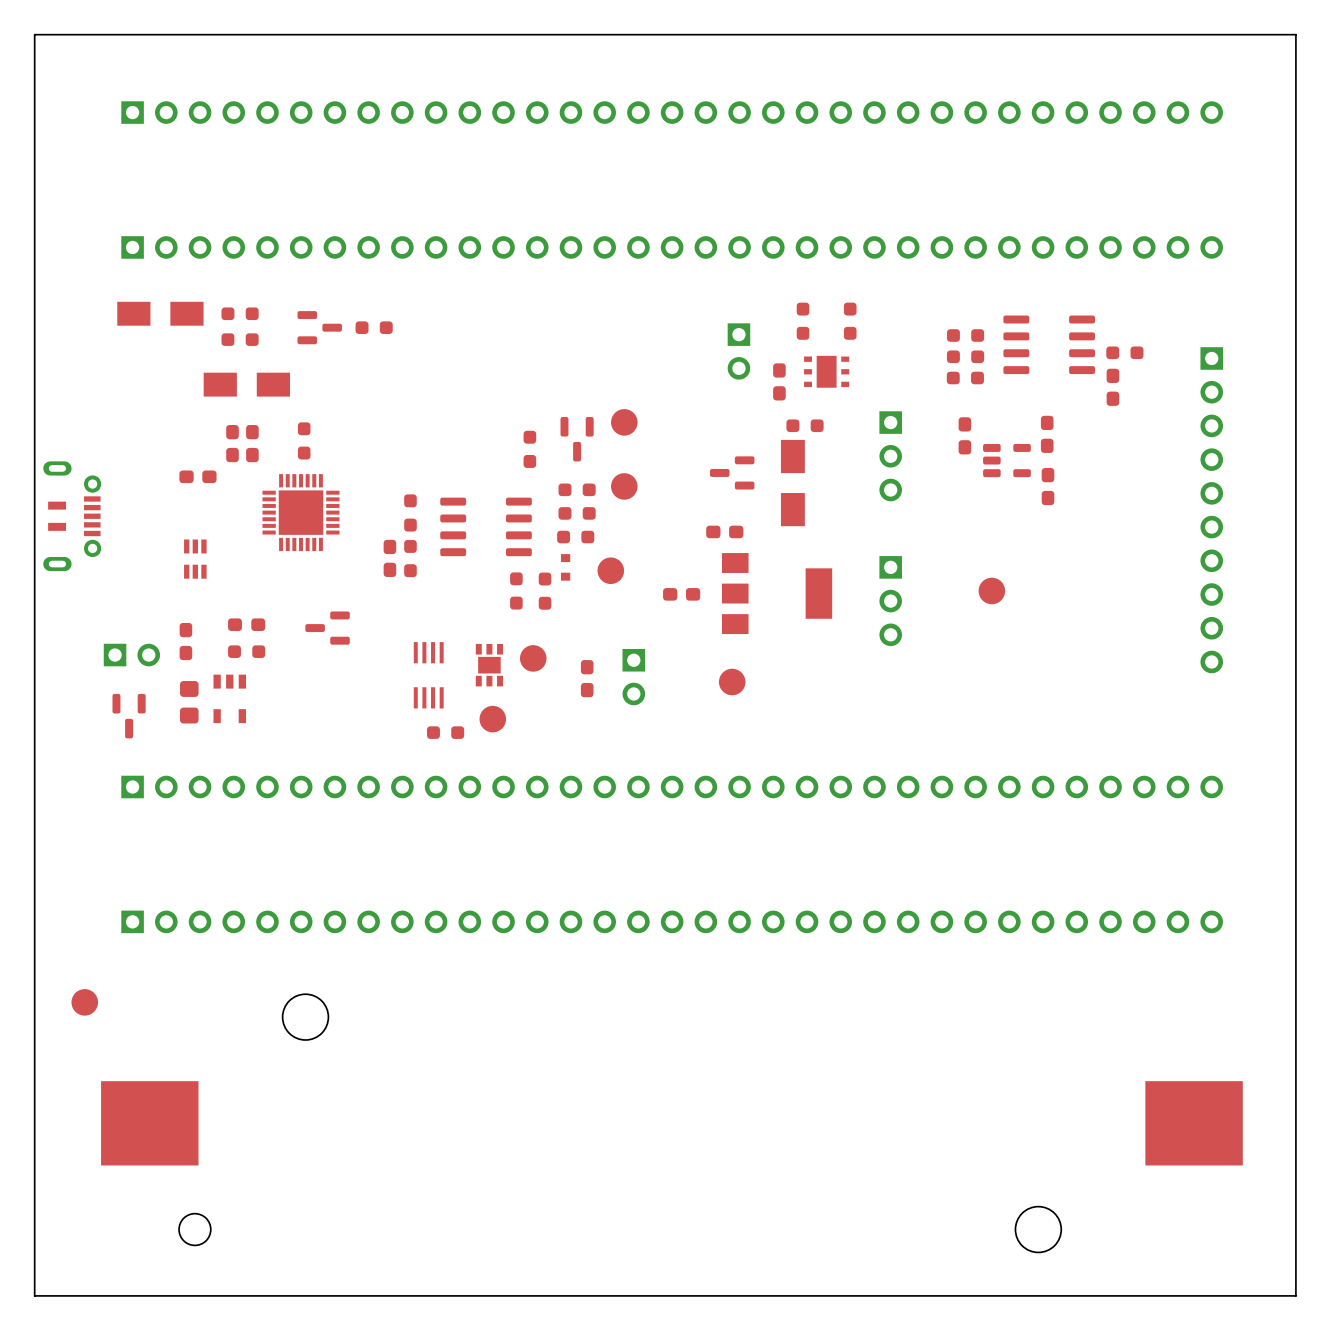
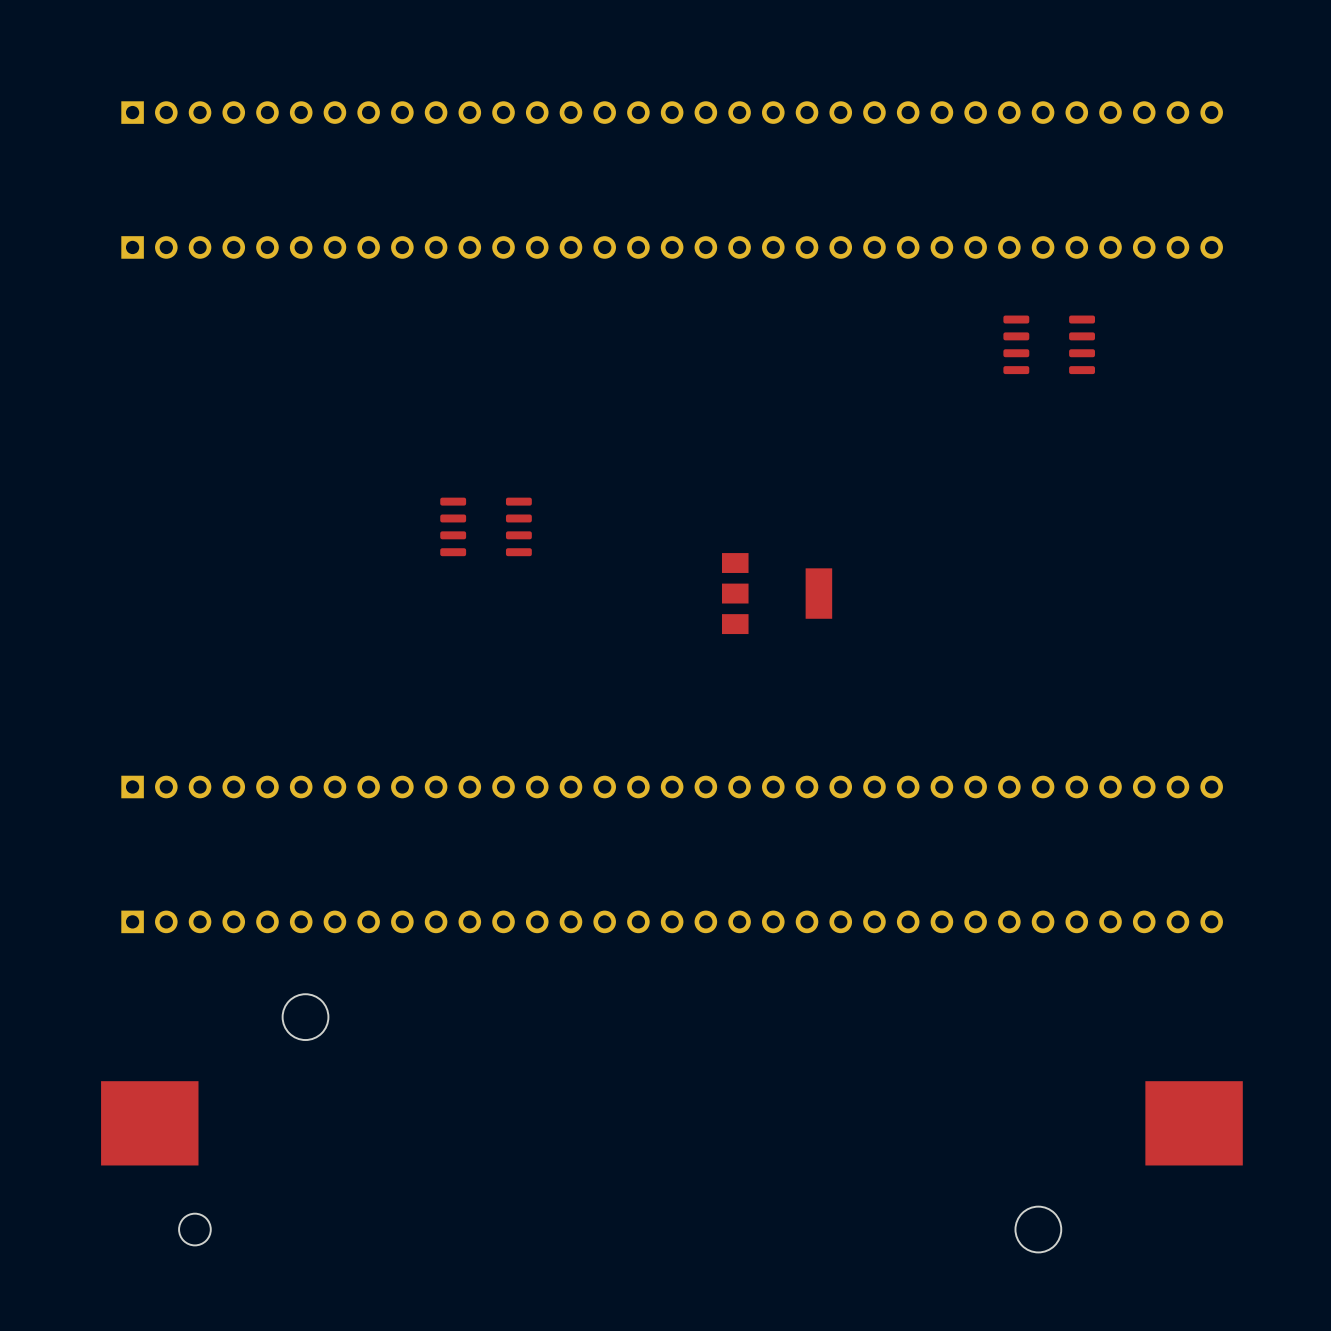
board edge: (1295, 34) (34, 34) (34, 1295) (1295, 1295) (1295, 34) -> none
part: (160, 313) -> none
part: (240, 313) -> none
part: (803, 321) -> none
part: (850, 321) -> none
part: (319, 327) -> none
part: (374, 327) -> none
part: (965, 335) -> none
part: (240, 339) -> none
part: (738, 351) -> none
part: (1124, 352) -> none
part: (965, 356) -> none
part: (826, 371) -> none
part: (965, 378) -> none
part: (779, 381) -> none
part: (246, 384) -> none
part: (1112, 387) -> none
part: (624, 422) -> none
part: (805, 425) -> none
part: (1047, 434) -> none
part: (964, 435) -> none
part: (577, 439) -> none
part: (304, 440) -> none
part: (232, 443) -> none
part: (252, 443) -> none
part: (529, 449) -> none
part: (890, 456) -> none
part: (1006, 460) -> none
part: (732, 472) -> none
part: (197, 476) -> none
part: (792, 483) -> none
part: (624, 486) -> none
part: (1047, 486) -> none
part: (577, 489) -> none
part: (1211, 510) -> none
part: (301, 512) -> none
part: (410, 512) -> none
part: (577, 513) -> none
part: (72, 516) -> none
part: (724, 531) -> none
part: (575, 537) -> none
part: (389, 558) -> none
part: (410, 558) -> none
part: (195, 559) -> none
part: (565, 567) -> none
part: (610, 570) -> none
part: (516, 590) -> none
part: (991, 590) -> none
part: (545, 591) -> none
part: (681, 594) -> none
part: (890, 601) -> none
part: (246, 624) -> none
part: (327, 628) -> none
part: (185, 641) -> none
part: (246, 651) -> none
part: (131, 655) -> none
part: (533, 658) -> none
part: (489, 665) -> none
part: (428, 675) -> none
part: (633, 677) -> none
part: (587, 678) -> none
part: (732, 682) -> none
part: (229, 698) -> none
part: (189, 702) -> none
part: (129, 716) -> none
part: (492, 719) -> none
part: (445, 732) -> none
part: (84, 1002) -> none

